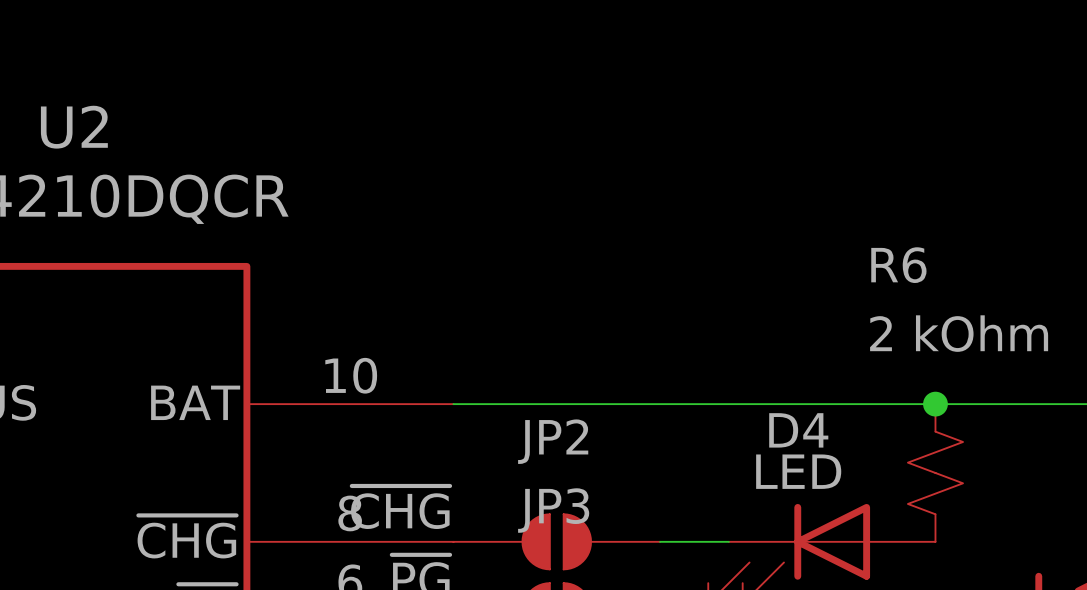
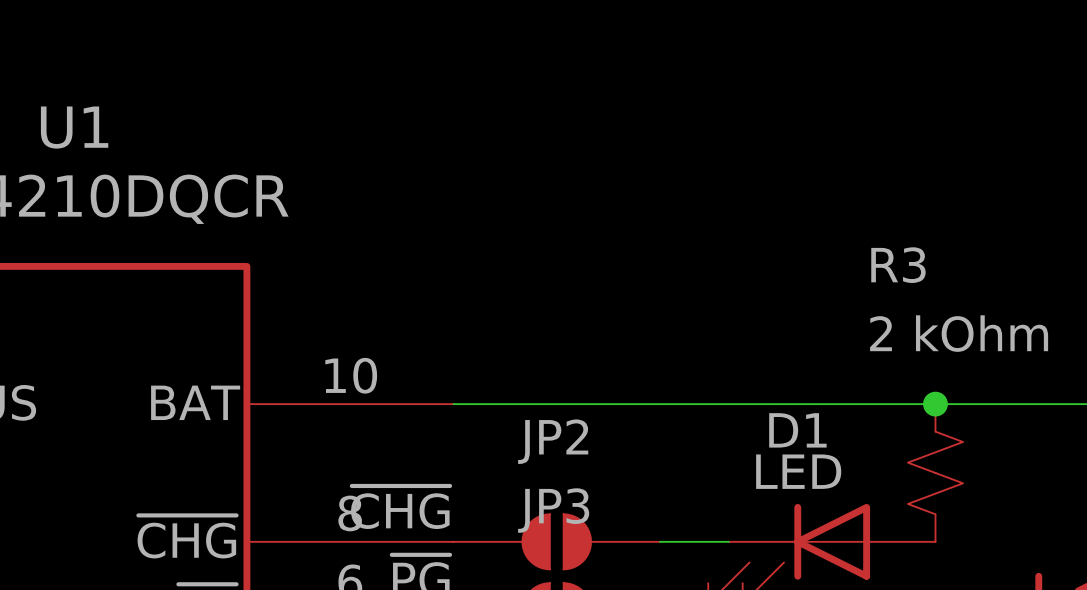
U2 name: U2 (74, 127) -> U1 (74, 127)
R6 name: R6 (898, 265) -> R3 (898, 265)
D4 name: D4 (798, 430) -> D1 (797, 430)

